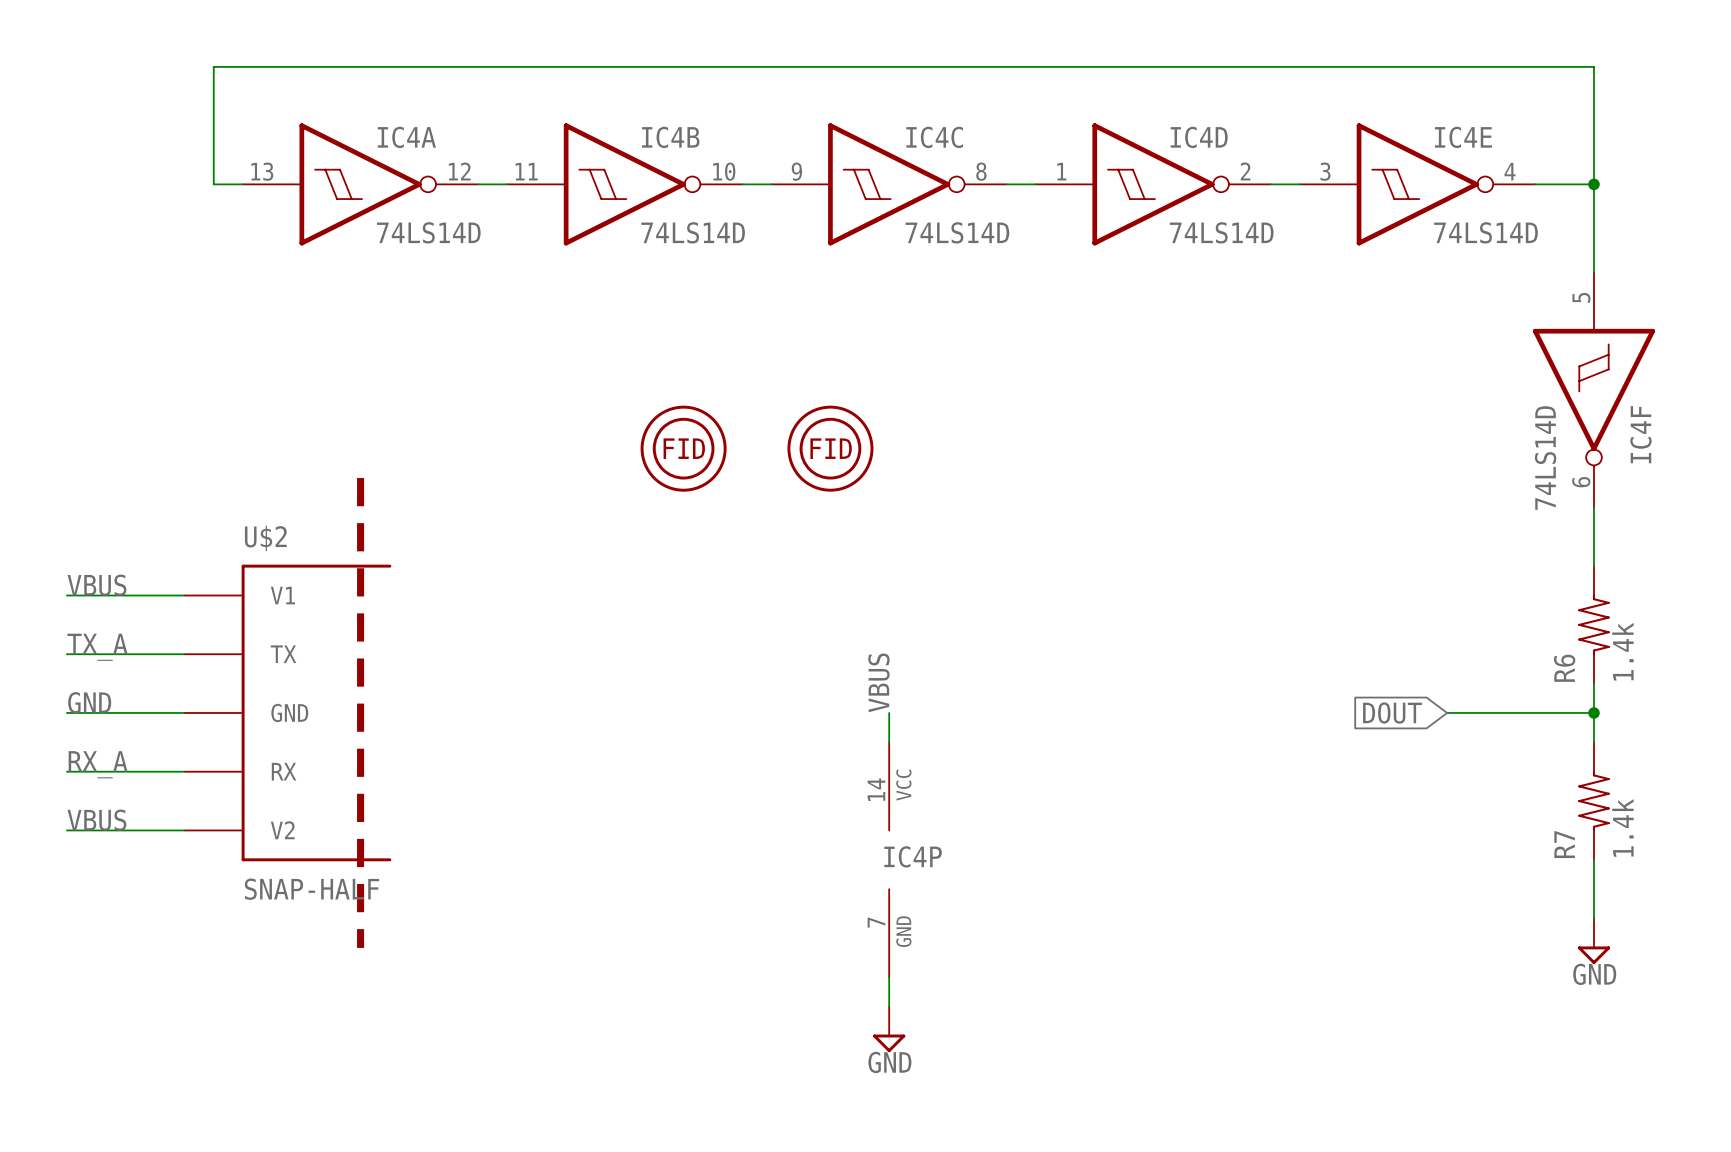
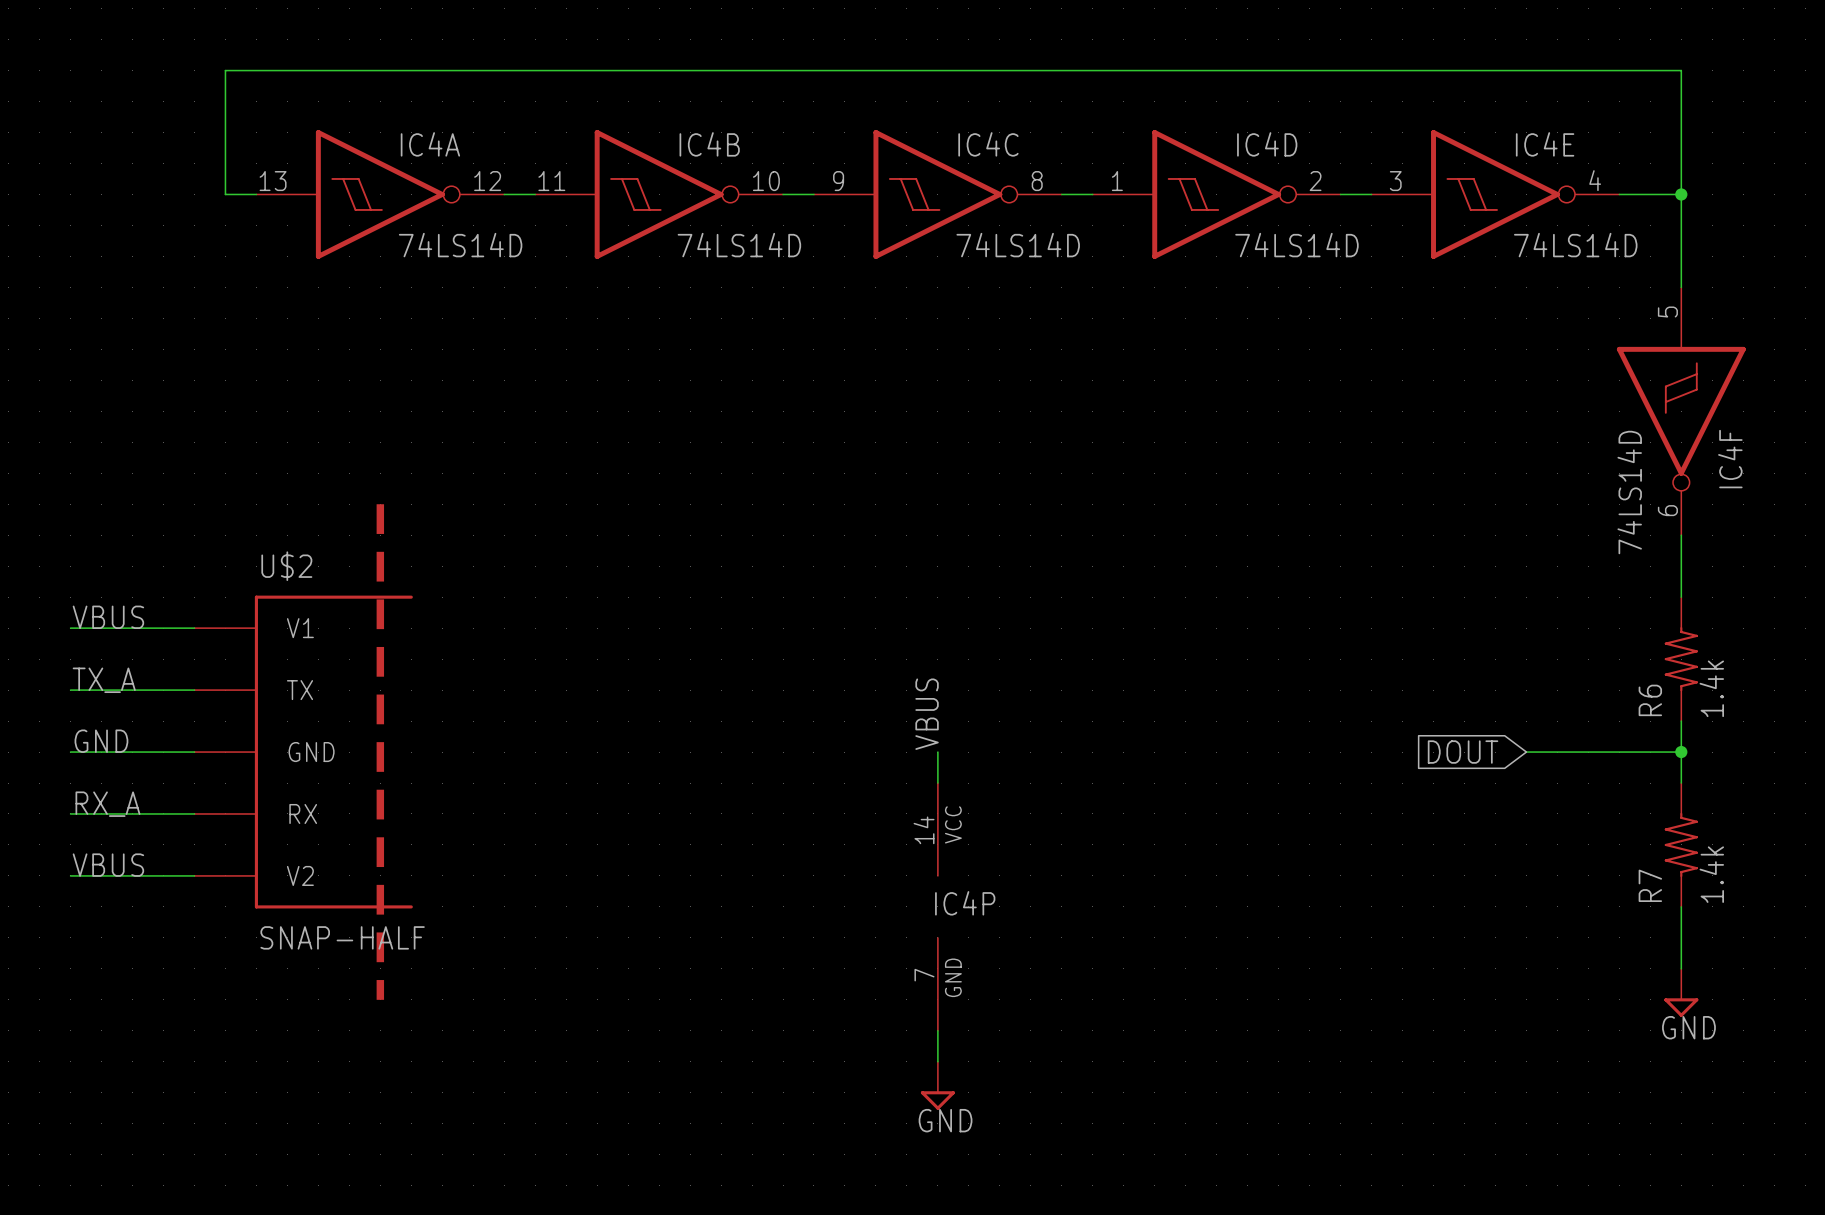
part: (683, 448) -> none
part: (830, 448) -> none

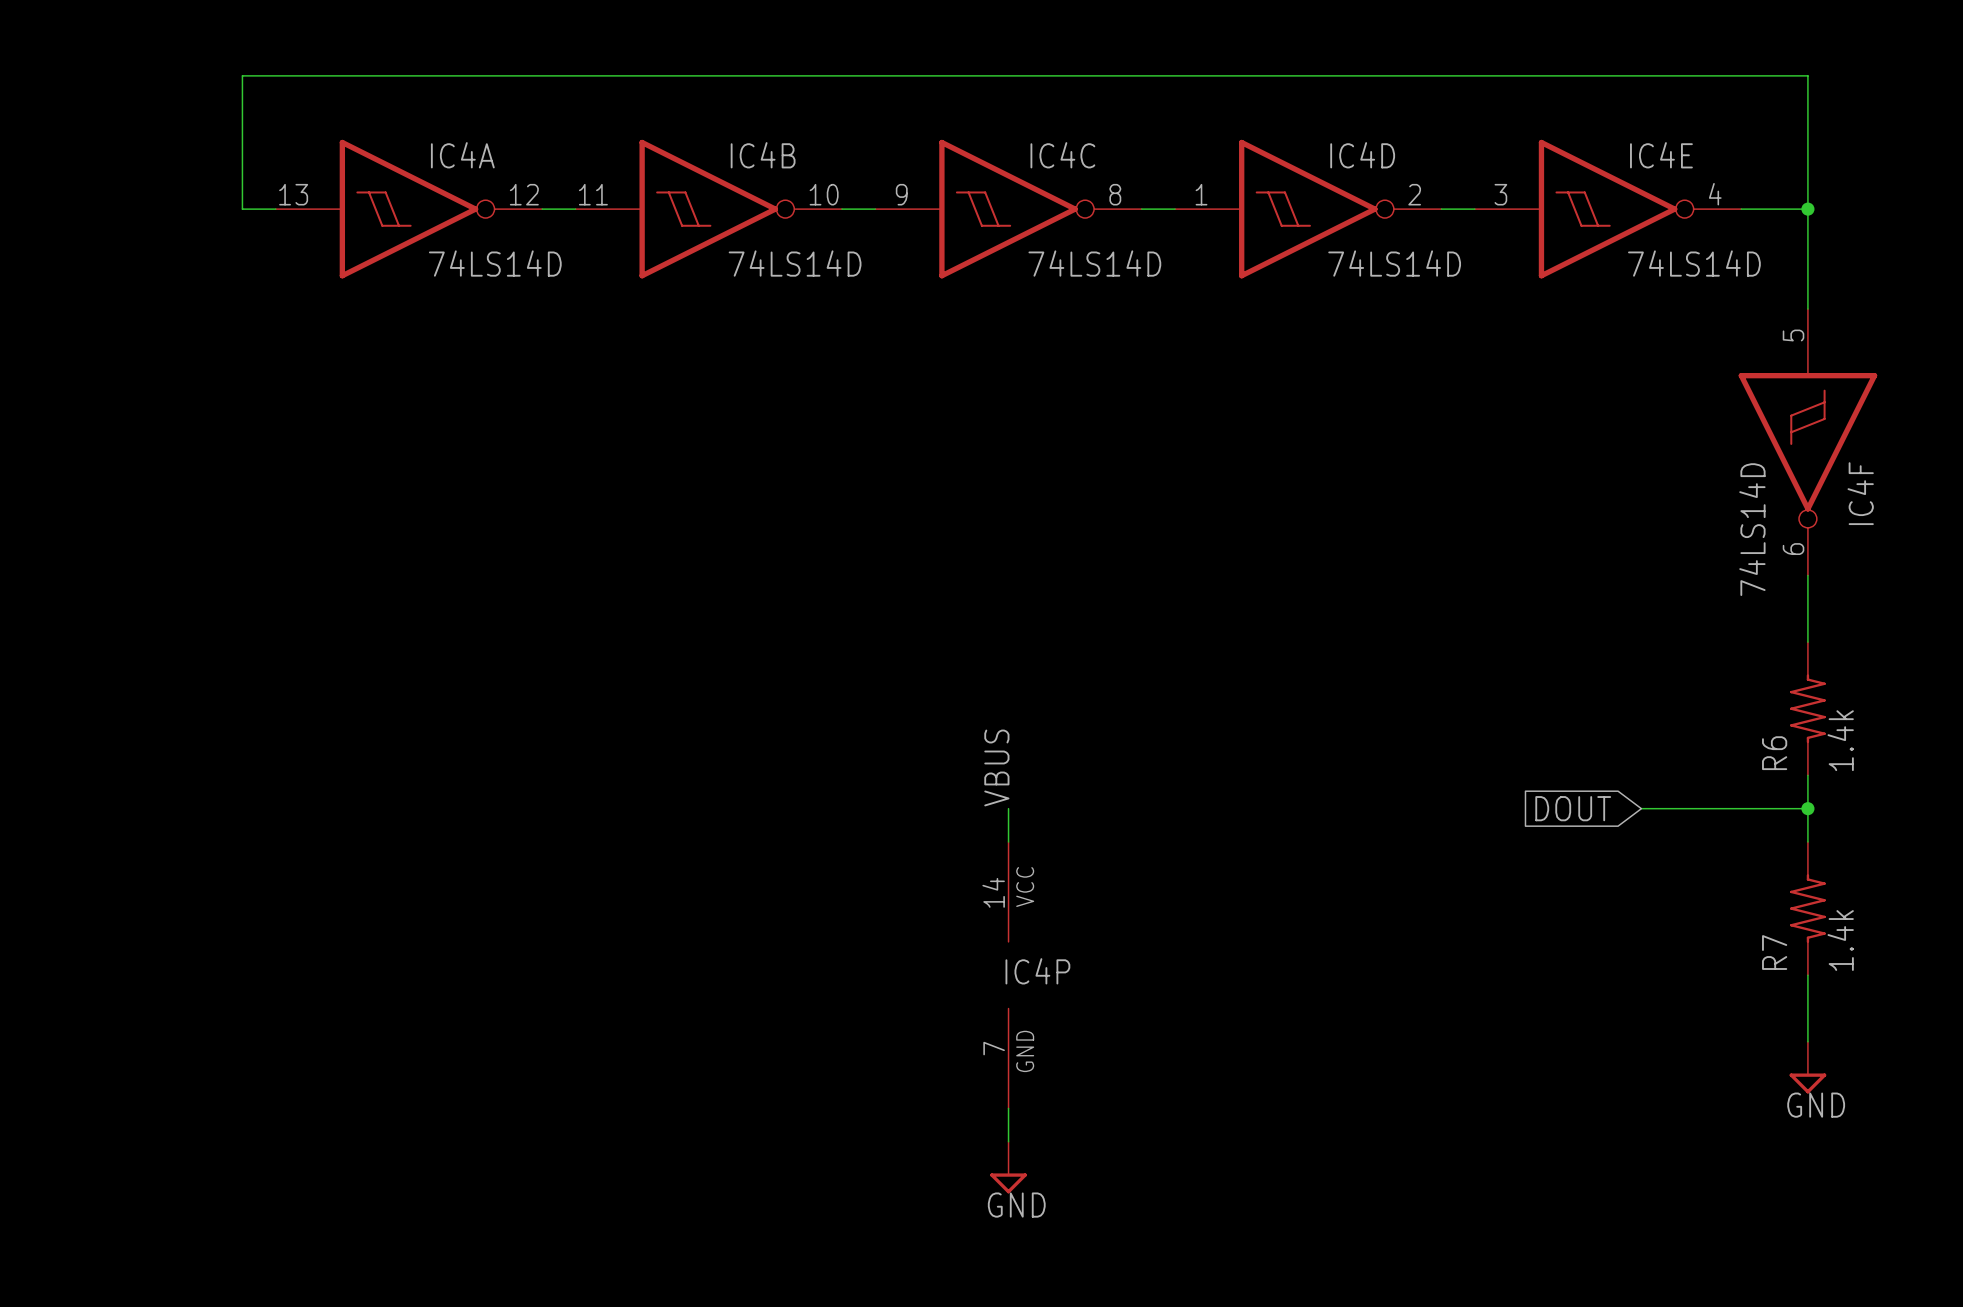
label: VBUS (108, 617) -> none
wire: (70, 628) (194, 628) -> none
label: TX_A (104, 680) -> none
wire: (70, 690) (194, 690) -> none
label: GND (101, 741) -> none
wire: (70, 752) (194, 752) -> none
U$2: SNAP-HALF (303, 752) -> none
label: RX_A (107, 804) -> none
wire: (70, 813) (194, 813) -> none
label: VBUS (108, 865) -> none
wire: (70, 875) (194, 875) -> none

